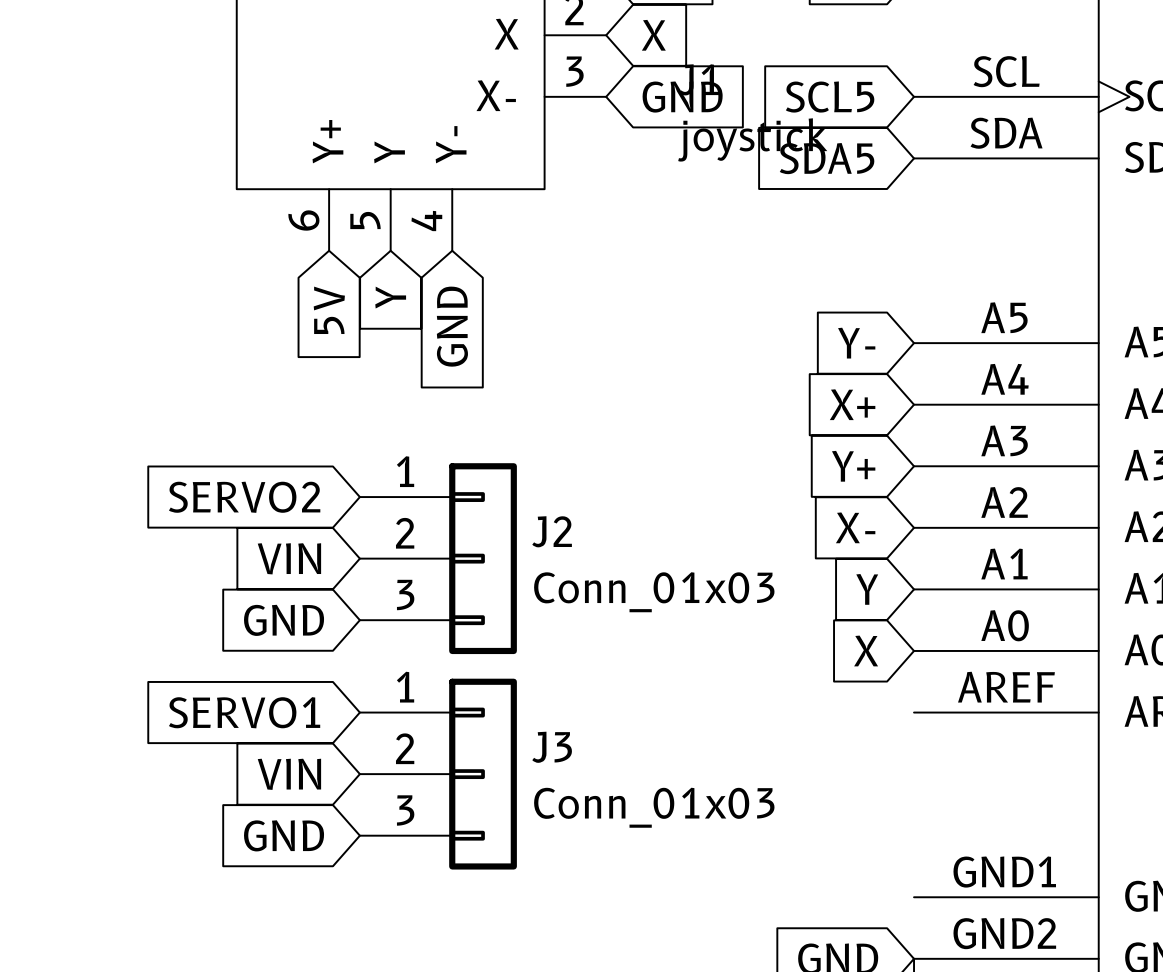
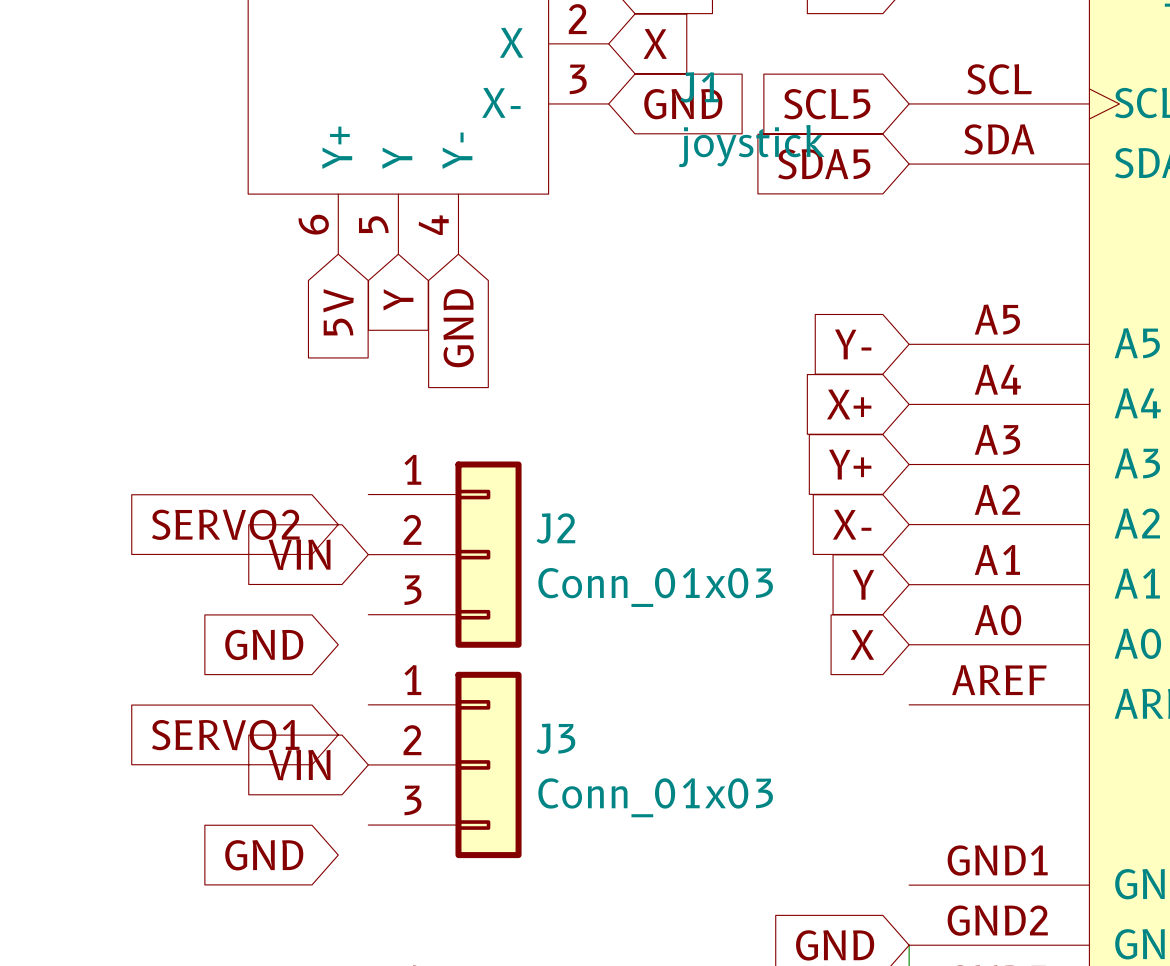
global label position: SERVO2 (244, 497) -> SERVO2 (225, 524)
global label position: GND (284, 620) -> GND (264, 644)
global label position: SERVO1 (244, 712) -> SERVO1 (225, 735)
global label position: GND (284, 835) -> GND (264, 855)

